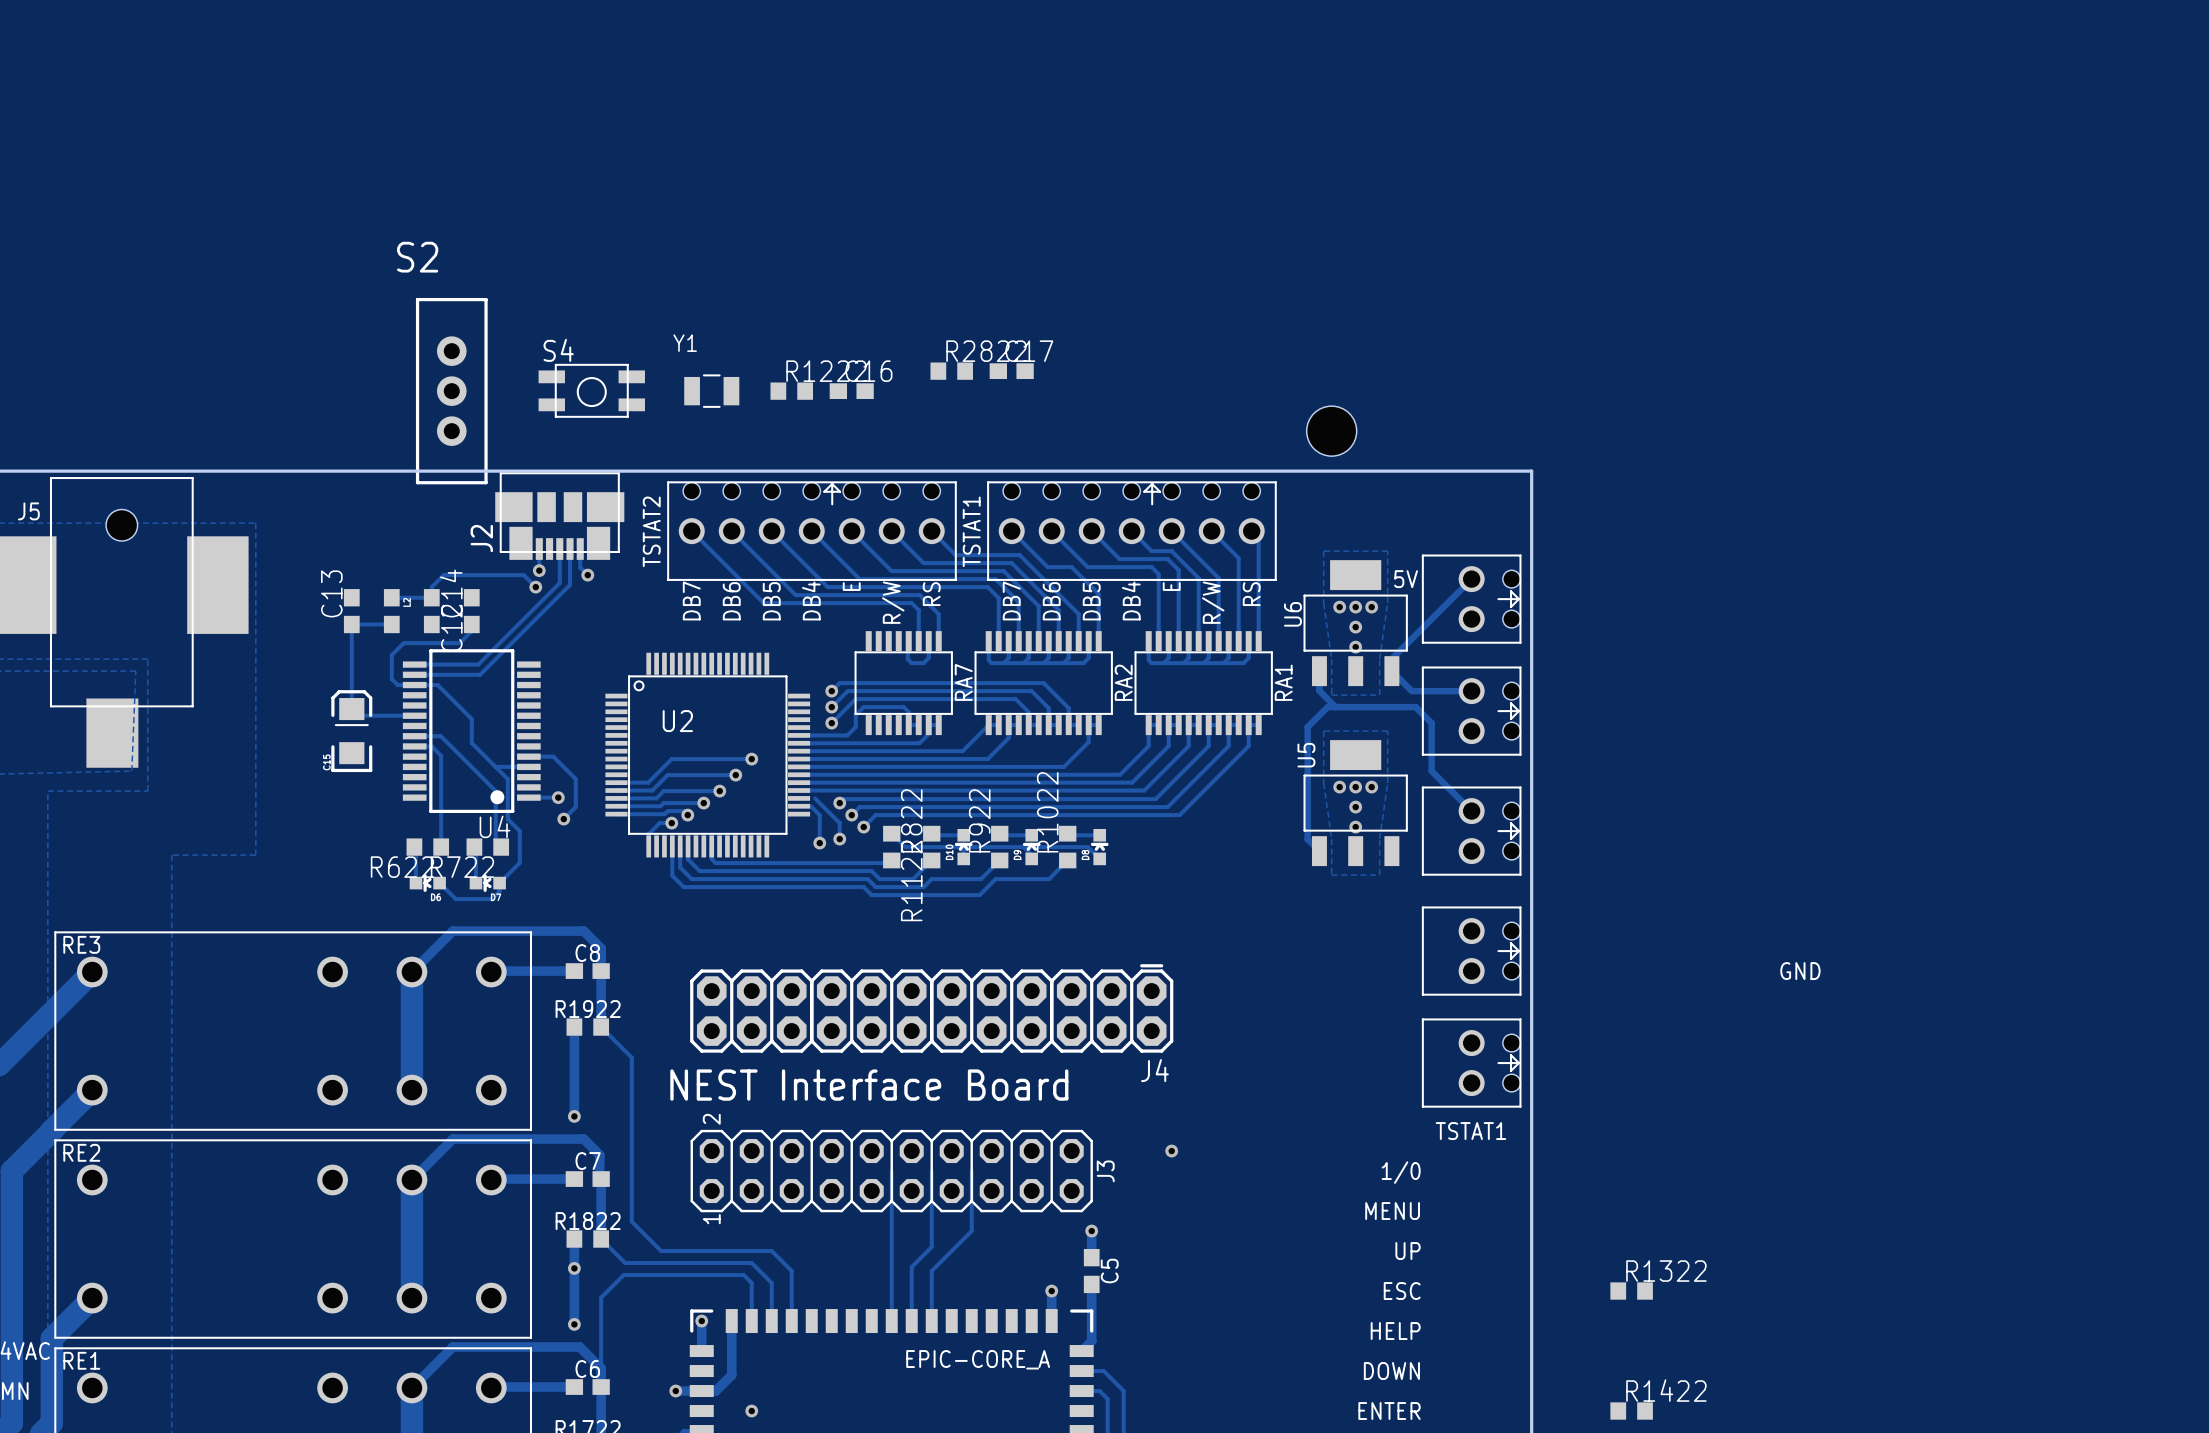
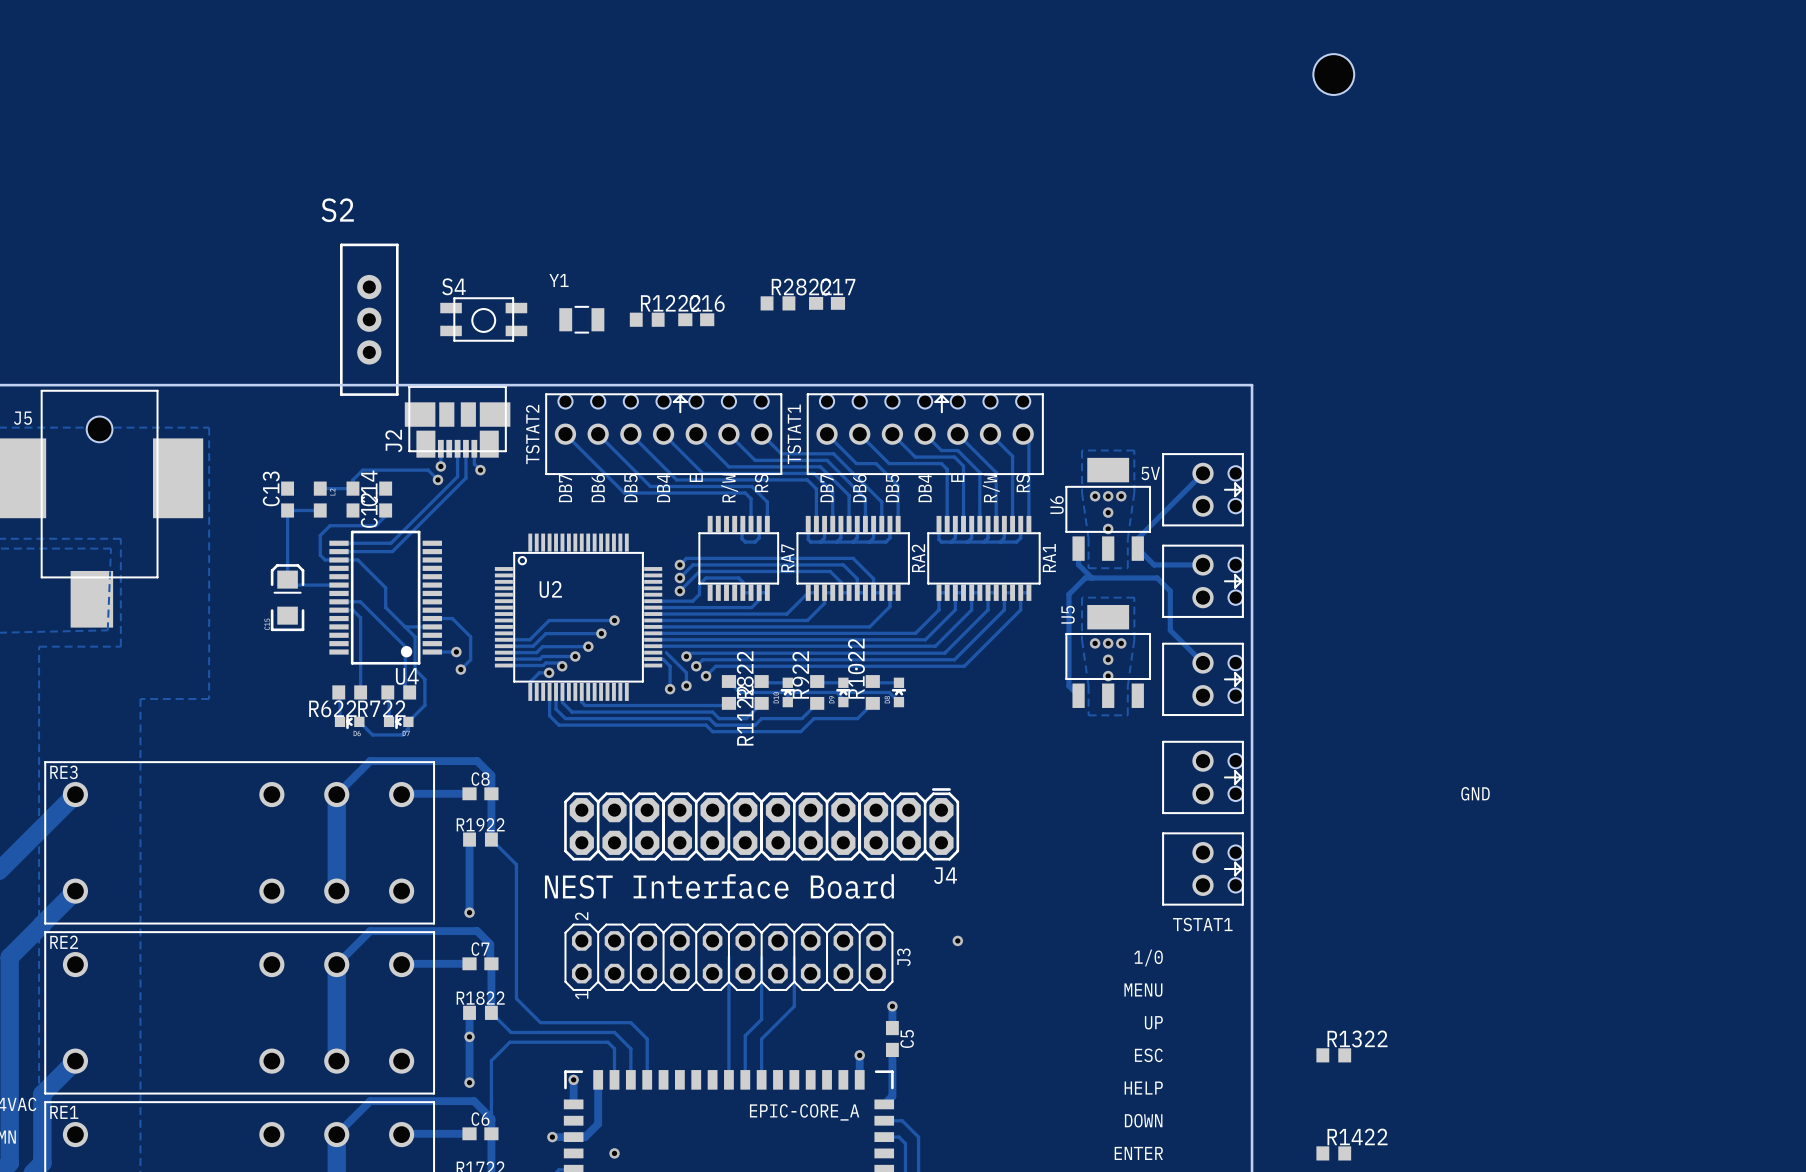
hole: none -> (1333, 74)
hole: (1331, 431) -> none

